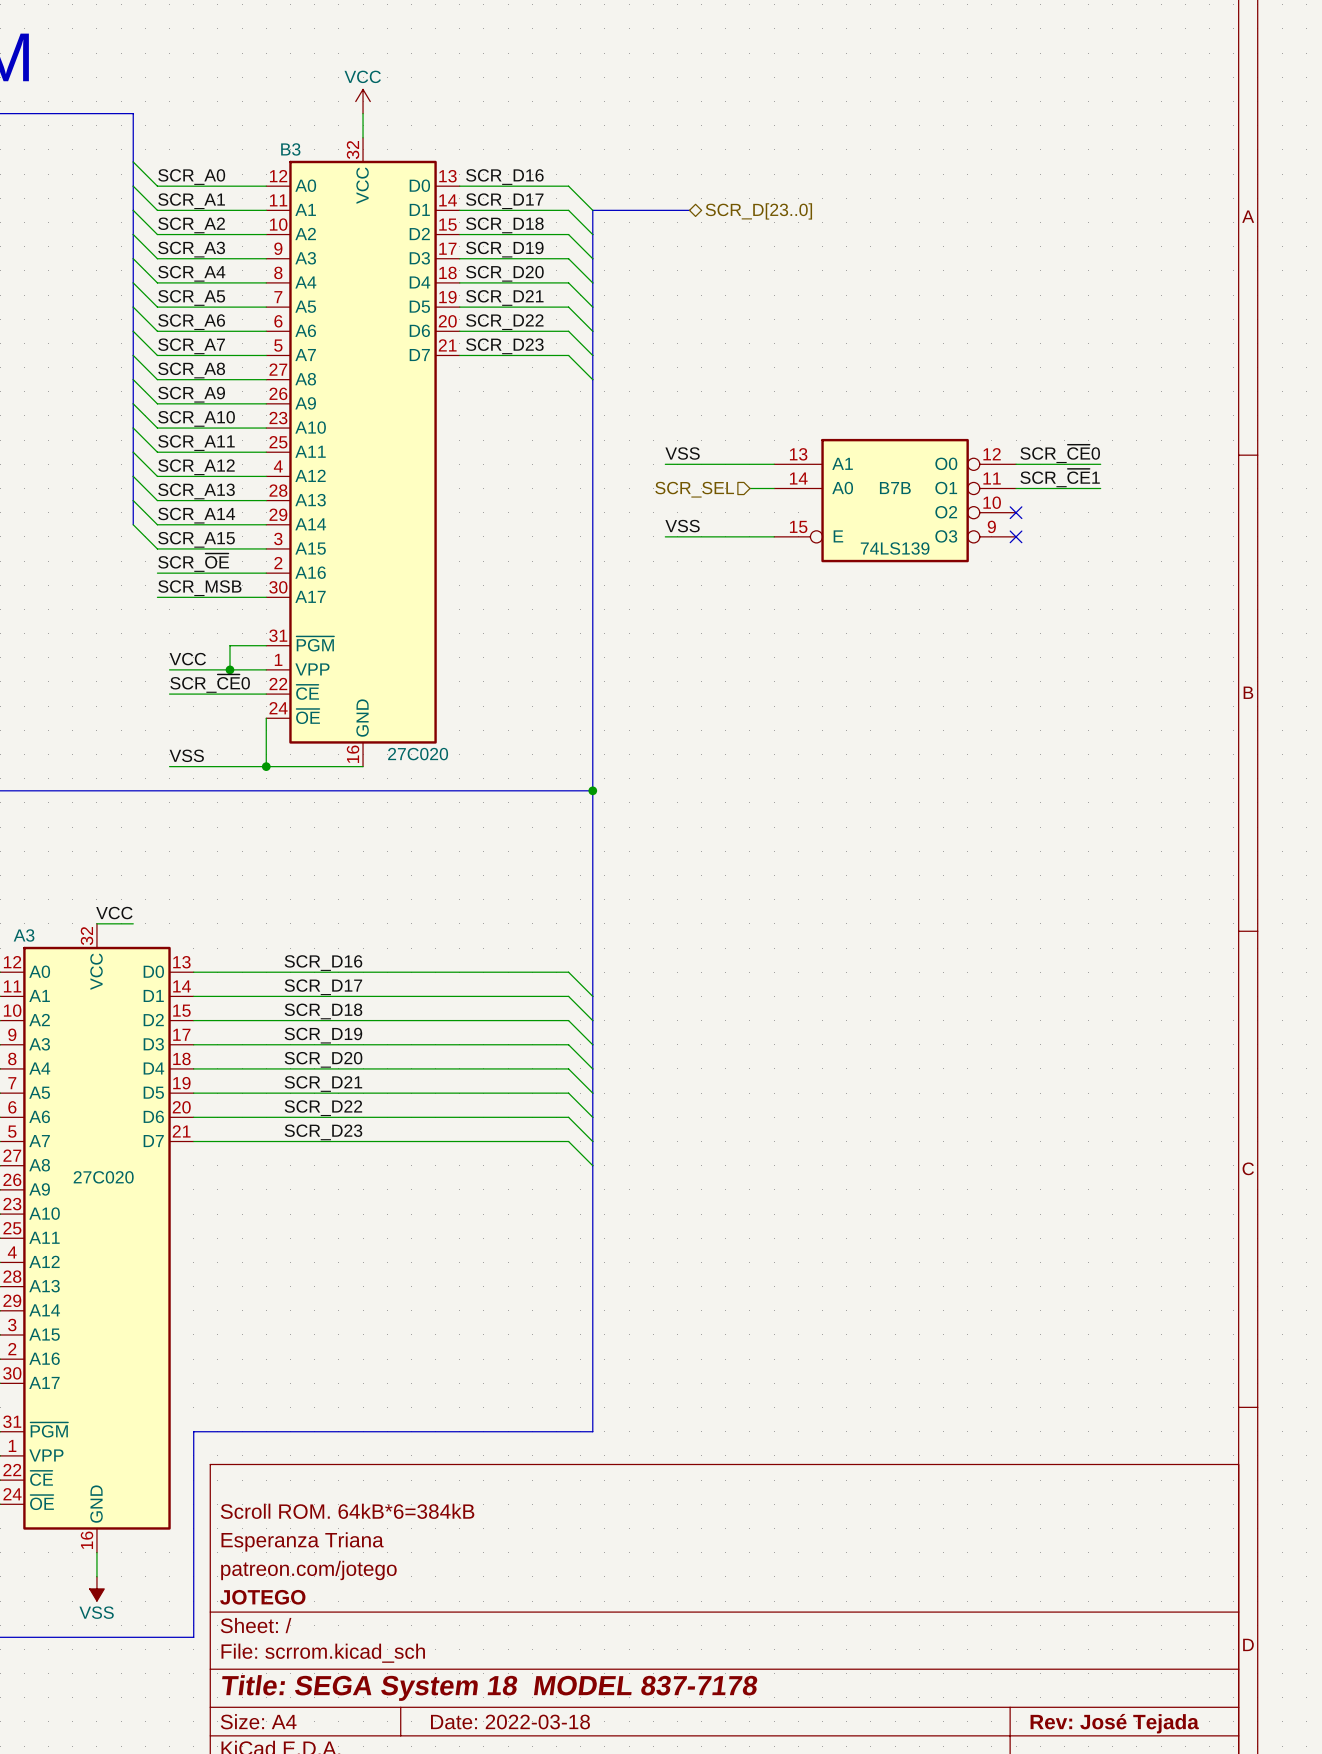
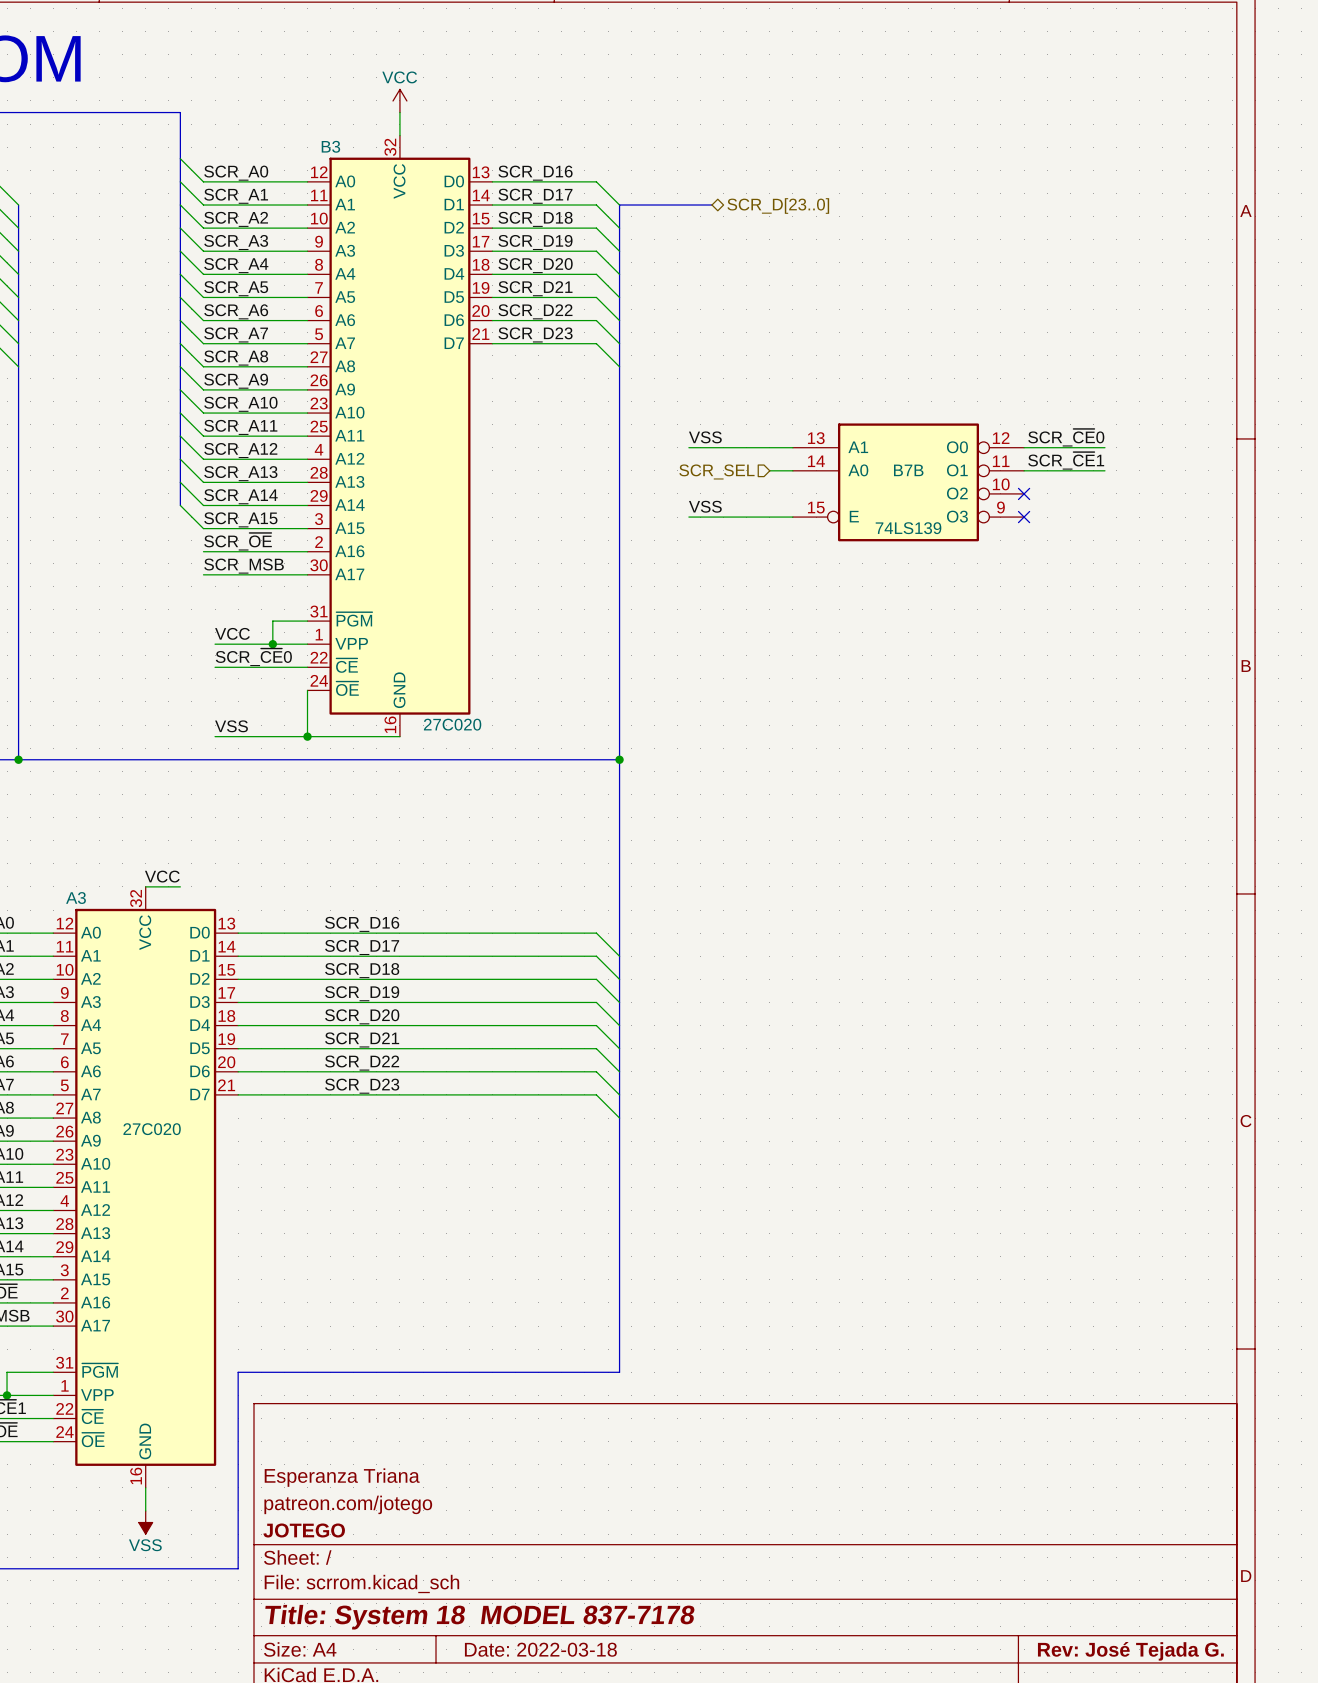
title block: Scroll ROM. 64kB*6=384kB (347, 1511) -> none
title block: Title: SEGA System 18 MODEL 837-7178 (489, 1688) -> Title: System 18 MODEL 837-7178 (479, 1617)
title block: Rev: José Tejada (1114, 1723) -> Rev: José Tejada G. (1130, 1651)

